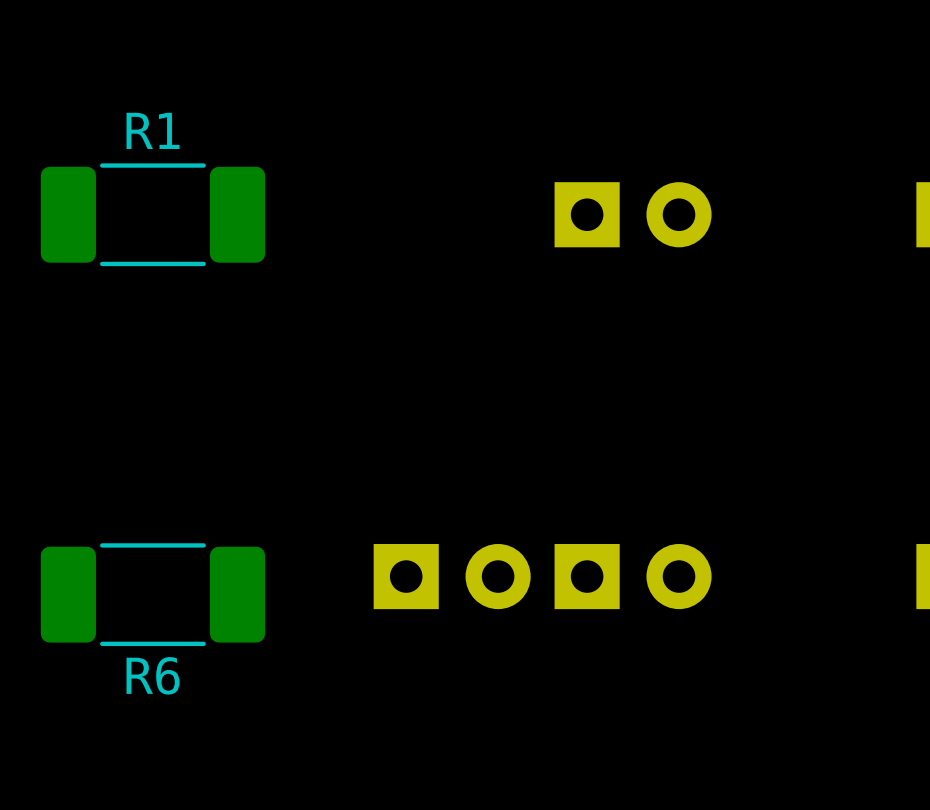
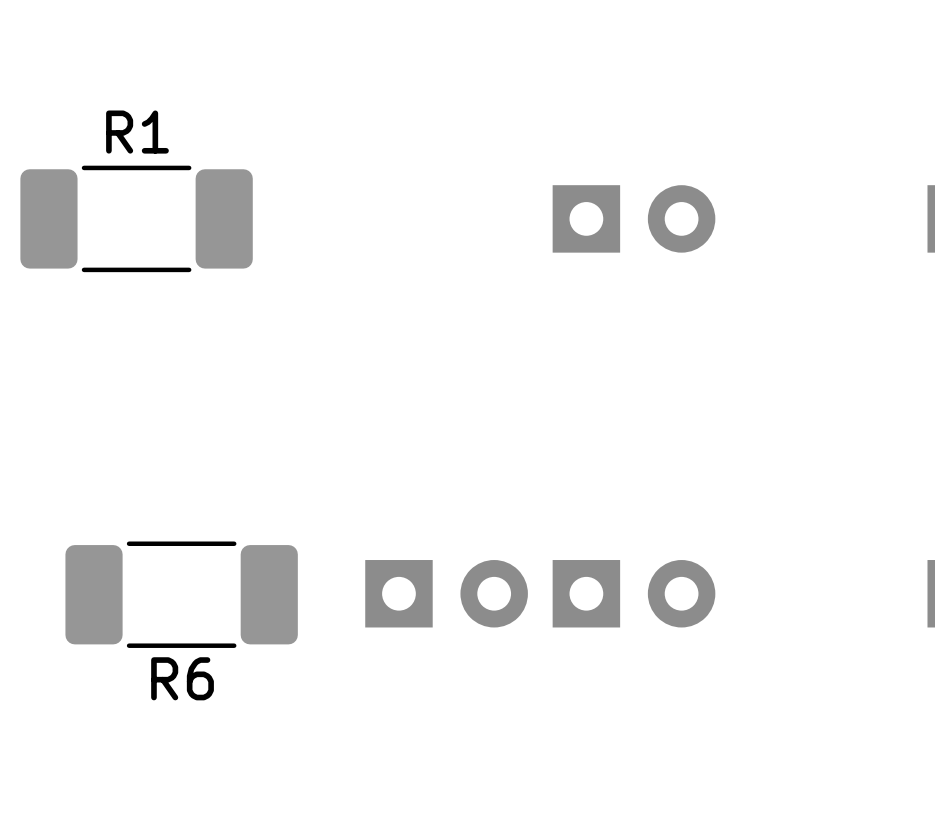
R6 position: (152, 594) -> (181, 594)

